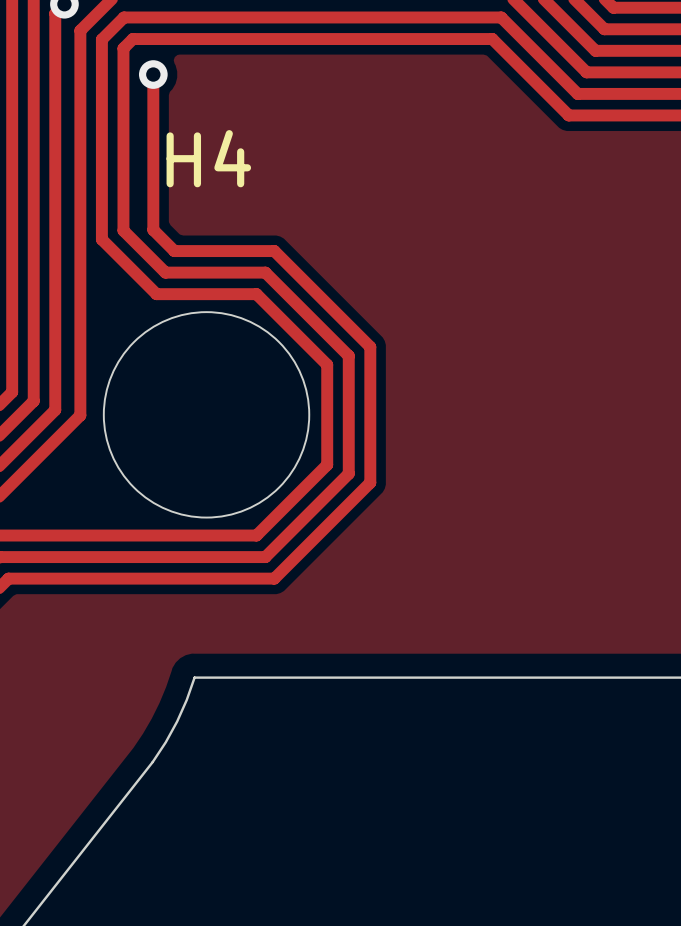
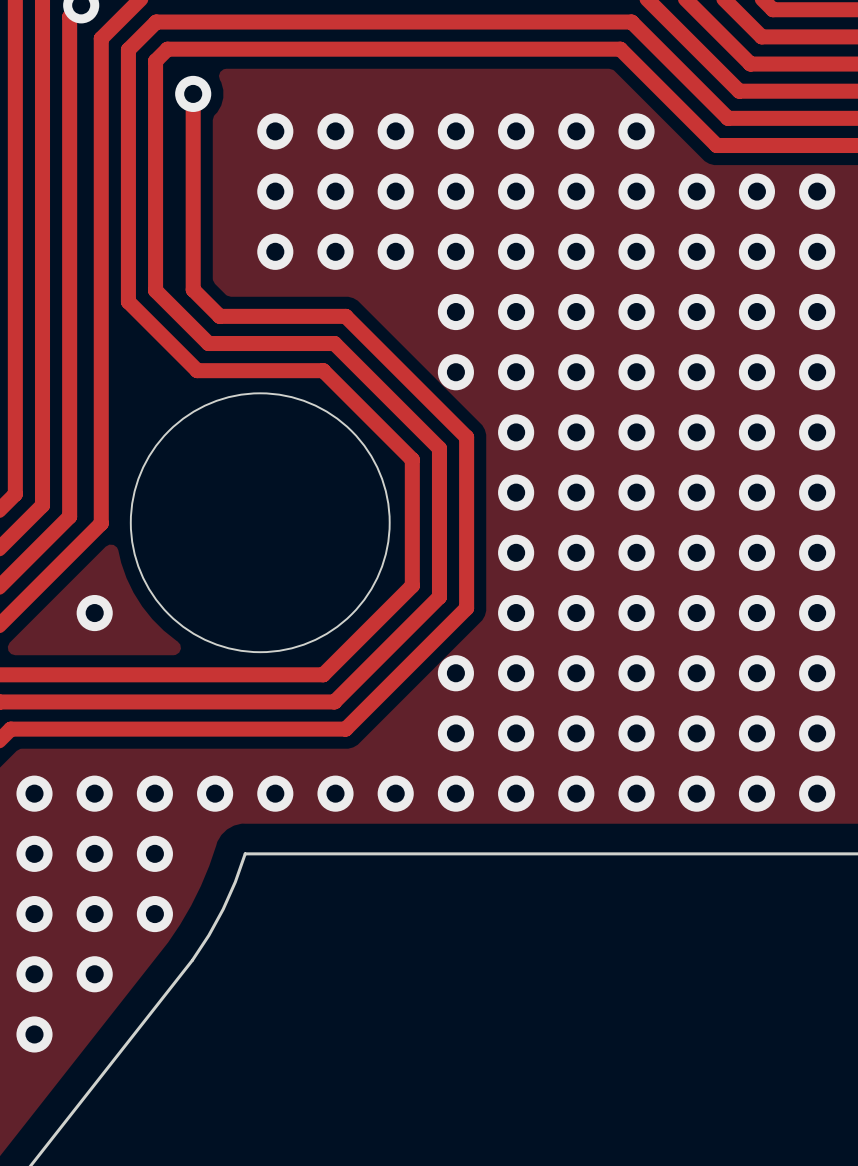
via: none -> (275, 131)
via: none -> (335, 131)
via: none -> (395, 131)
via: none -> (455, 131)
via: none -> (516, 131)
via: none -> (576, 131)
via: none -> (636, 131)
via: none -> (275, 191)
via: none -> (335, 191)
via: none -> (395, 191)
via: none -> (455, 191)
via: none -> (516, 191)
via: none -> (576, 191)
via: none -> (636, 191)
via: none -> (696, 191)
via: none -> (756, 191)
via: none -> (817, 191)
H4 name: H4 (208, 158) -> none
via: none -> (275, 251)
via: none -> (335, 251)
via: none -> (395, 251)
via: none -> (455, 251)
via: none -> (516, 251)
via: none -> (576, 251)
via: none -> (636, 251)
via: none -> (696, 251)
via: none -> (756, 251)
via: none -> (817, 251)
via: none -> (455, 312)
via: none -> (516, 312)
via: none -> (576, 312)
via: none -> (636, 312)
via: none -> (696, 312)
via: none -> (756, 312)
via: none -> (817, 312)
via: none -> (455, 372)
via: none -> (516, 372)
via: none -> (576, 372)
via: none -> (636, 372)
via: none -> (696, 372)
via: none -> (756, 372)
via: none -> (817, 372)
via: none -> (516, 432)
via: none -> (576, 432)
via: none -> (636, 432)
via: none -> (696, 432)
via: none -> (756, 432)
via: none -> (817, 432)
via: none -> (516, 492)
via: none -> (576, 492)
via: none -> (636, 492)
via: none -> (696, 492)
via: none -> (756, 492)
via: none -> (817, 492)
via: none -> (516, 552)
via: none -> (576, 552)
via: none -> (636, 552)
via: none -> (696, 552)
via: none -> (756, 552)
via: none -> (817, 552)
via: none -> (94, 613)
via: none -> (516, 613)
via: none -> (576, 613)
via: none -> (636, 613)
via: none -> (696, 613)
via: none -> (756, 613)
via: none -> (817, 613)
via: none -> (455, 673)
via: none -> (516, 673)
via: none -> (576, 673)
via: none -> (636, 673)
via: none -> (696, 673)
via: none -> (756, 673)
via: none -> (817, 673)
via: none -> (455, 733)
via: none -> (516, 733)
via: none -> (576, 733)
via: none -> (636, 733)
via: none -> (696, 733)
via: none -> (756, 733)
via: none -> (817, 733)
via: none -> (34, 793)
via: none -> (94, 793)
via: none -> (154, 793)
via: none -> (215, 793)
via: none -> (275, 793)
via: none -> (335, 793)
via: none -> (395, 793)
via: none -> (455, 793)
via: none -> (516, 793)
via: none -> (576, 793)
via: none -> (636, 793)
via: none -> (696, 793)
via: none -> (756, 793)
via: none -> (817, 793)
via: none -> (34, 853)
via: none -> (94, 853)
via: none -> (154, 853)
via: none -> (34, 914)
via: none -> (94, 914)
via: none -> (154, 914)
via: none -> (34, 974)
via: none -> (94, 974)
via: none -> (34, 1034)

